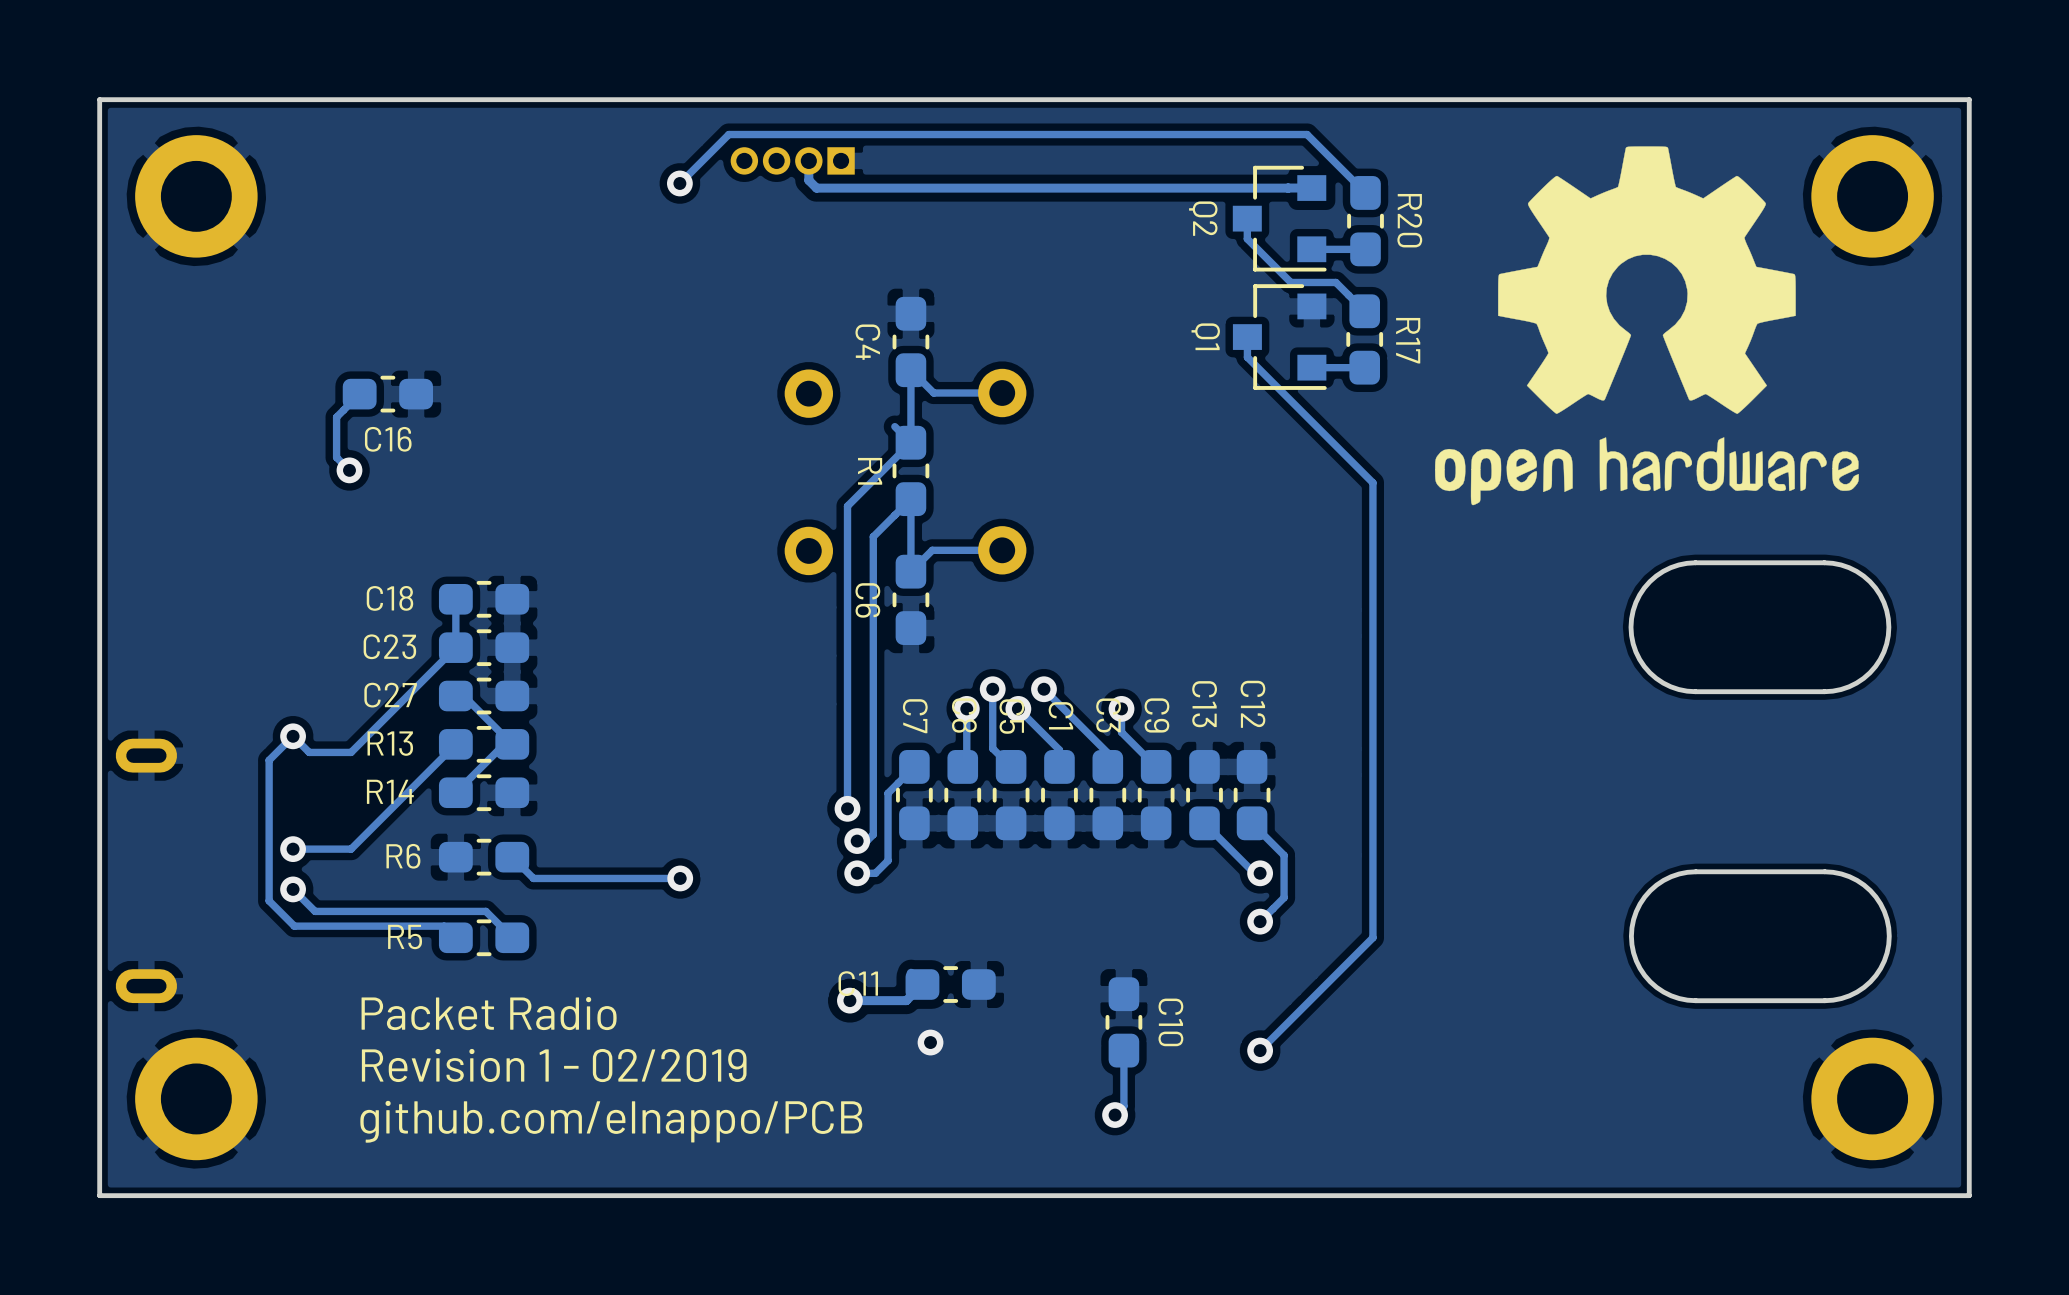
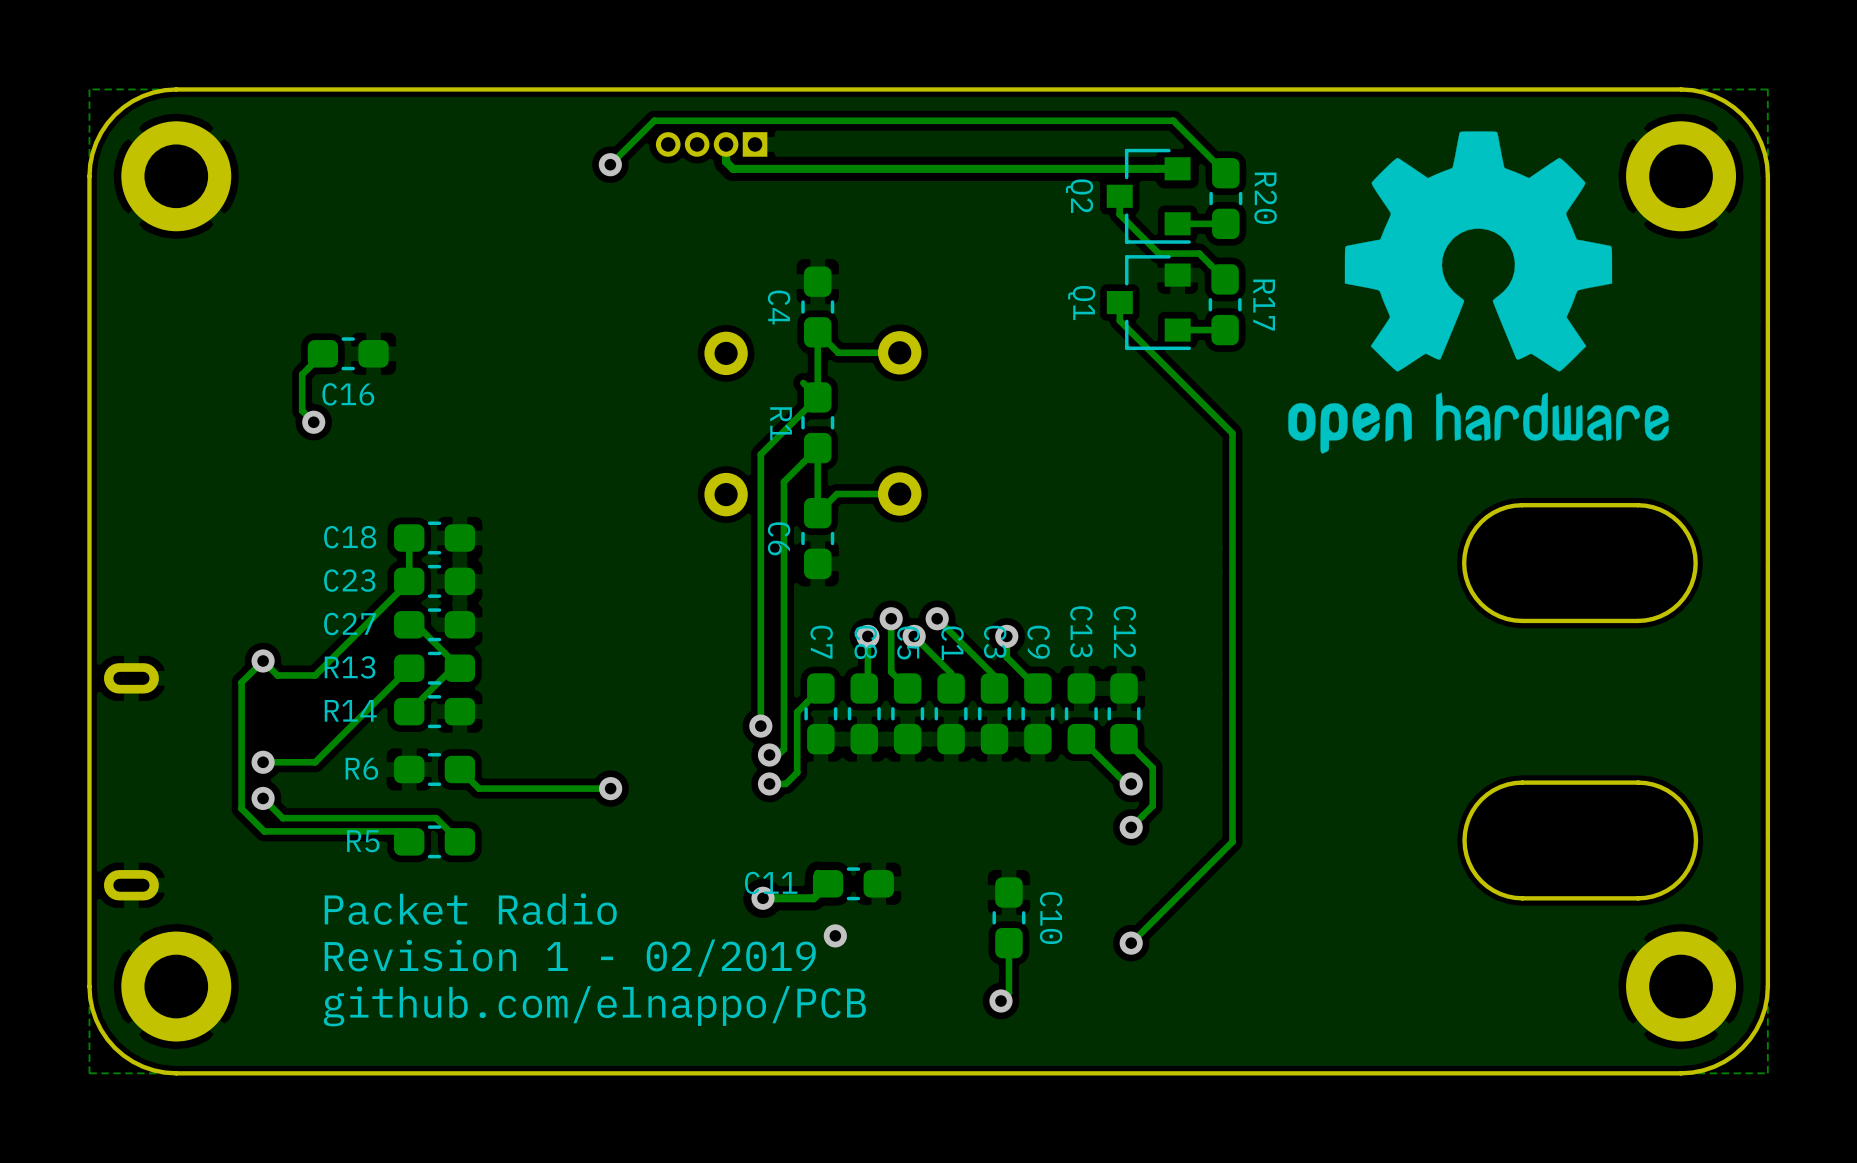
board edge: (196, 99) (99, 99) (99, 196) -> (176, 89) (143, 96) (114, 114) (96, 143) (89, 176)
board edge: (1872, 99) (1969, 99) (1969, 196) -> (1681, 89) (1714, 96) (1742, 114) (1761, 143) (1767, 176)
board edge: (99, 1098) (99, 1195) (196, 1195) -> (89, 986) (96, 1019) (114, 1047) (143, 1066) (176, 1073)
board edge: (1969, 1098) (1969, 1195) (1872, 1195) -> (1767, 986) (1761, 1019) (1742, 1047) (1714, 1066) (1681, 1073)

